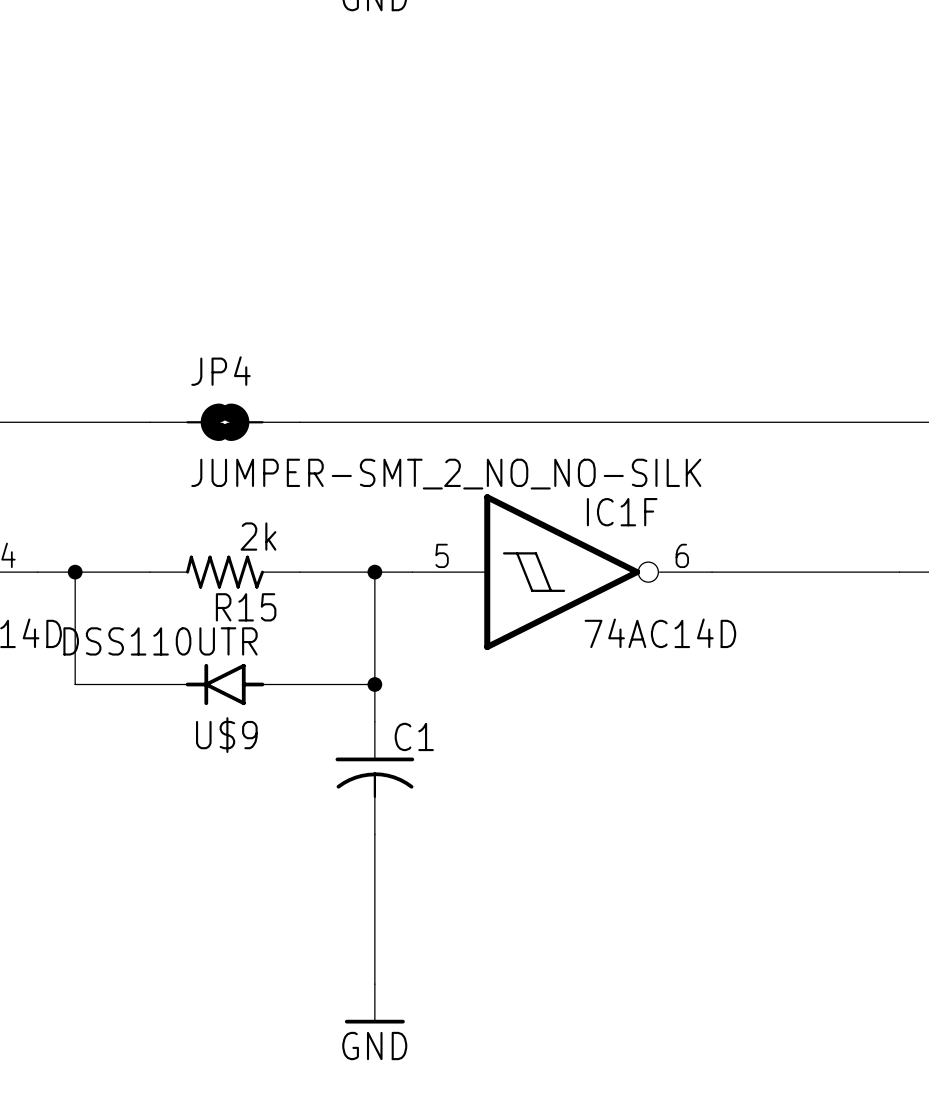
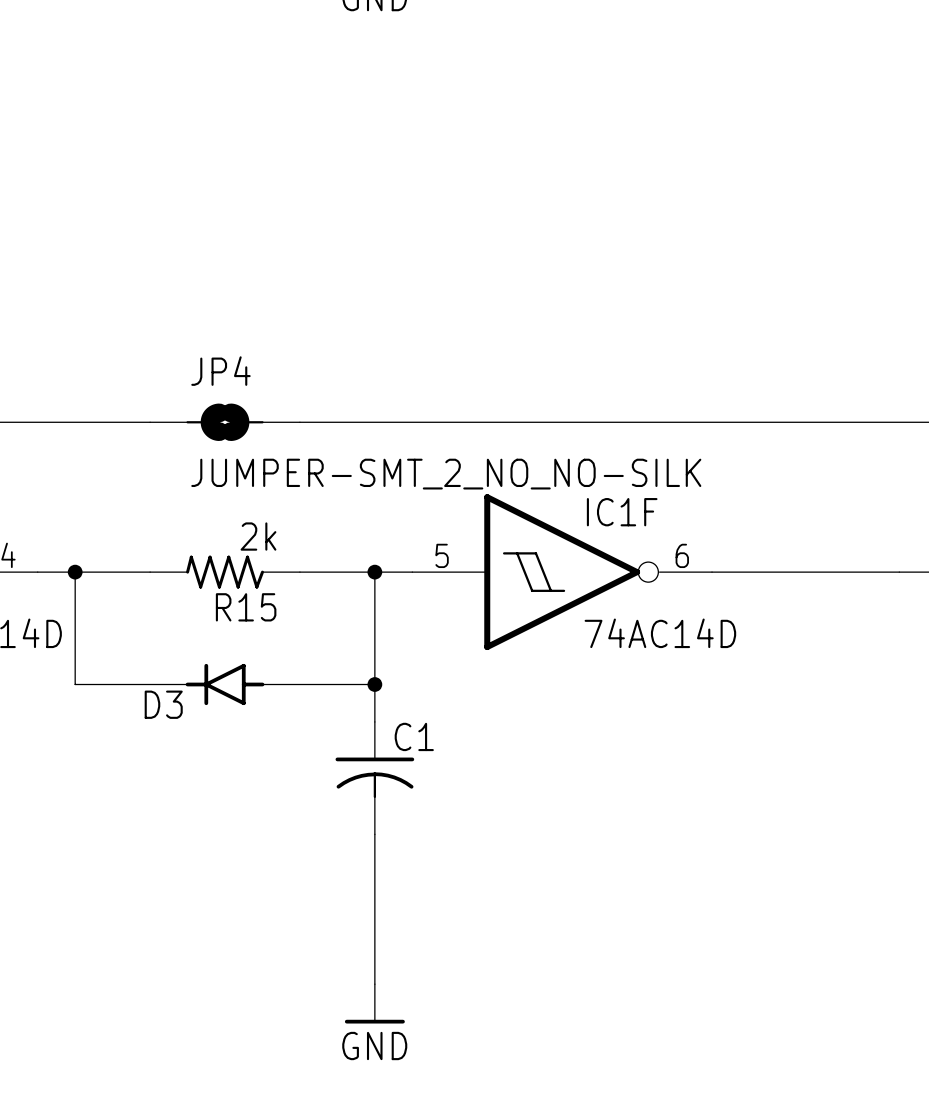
U$9 value: DSS110UTR (160, 641) -> none
U$9 name: U$9 (226, 735) -> D3 (163, 704)

